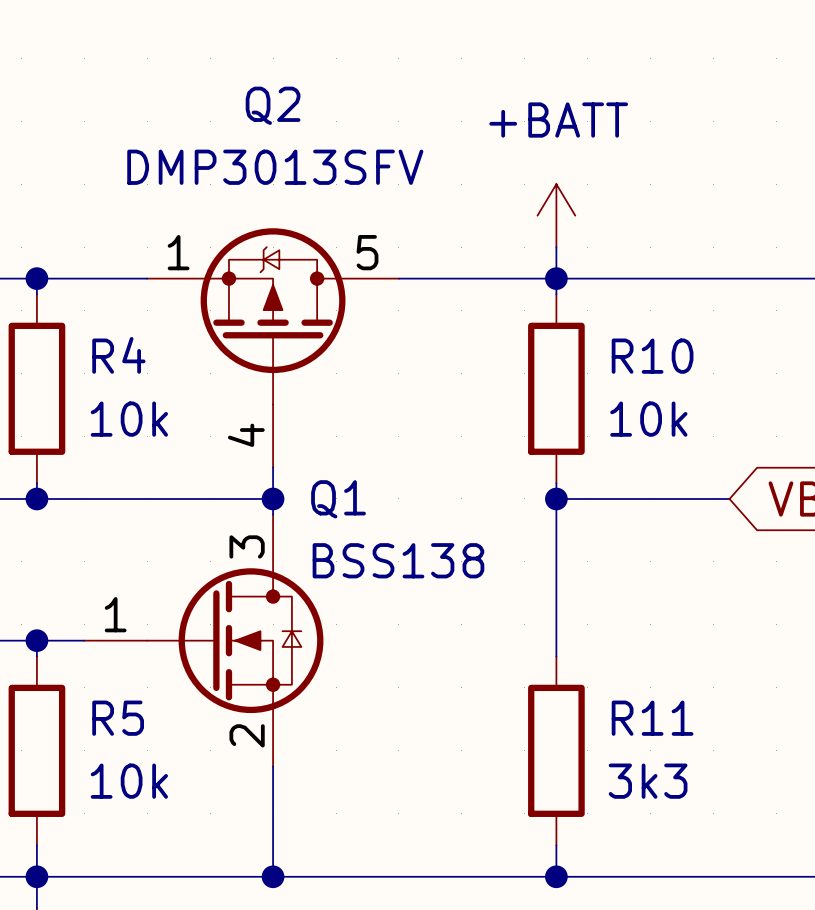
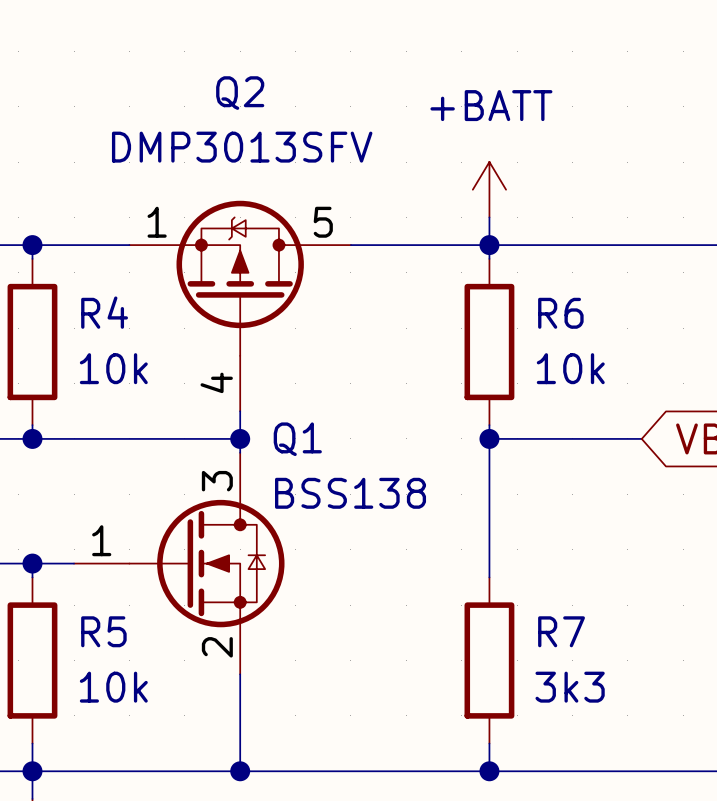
R10 name: R10 (652, 356) -> R6 (560, 313)
R11 name: R11 (652, 718) -> R7 (561, 631)

